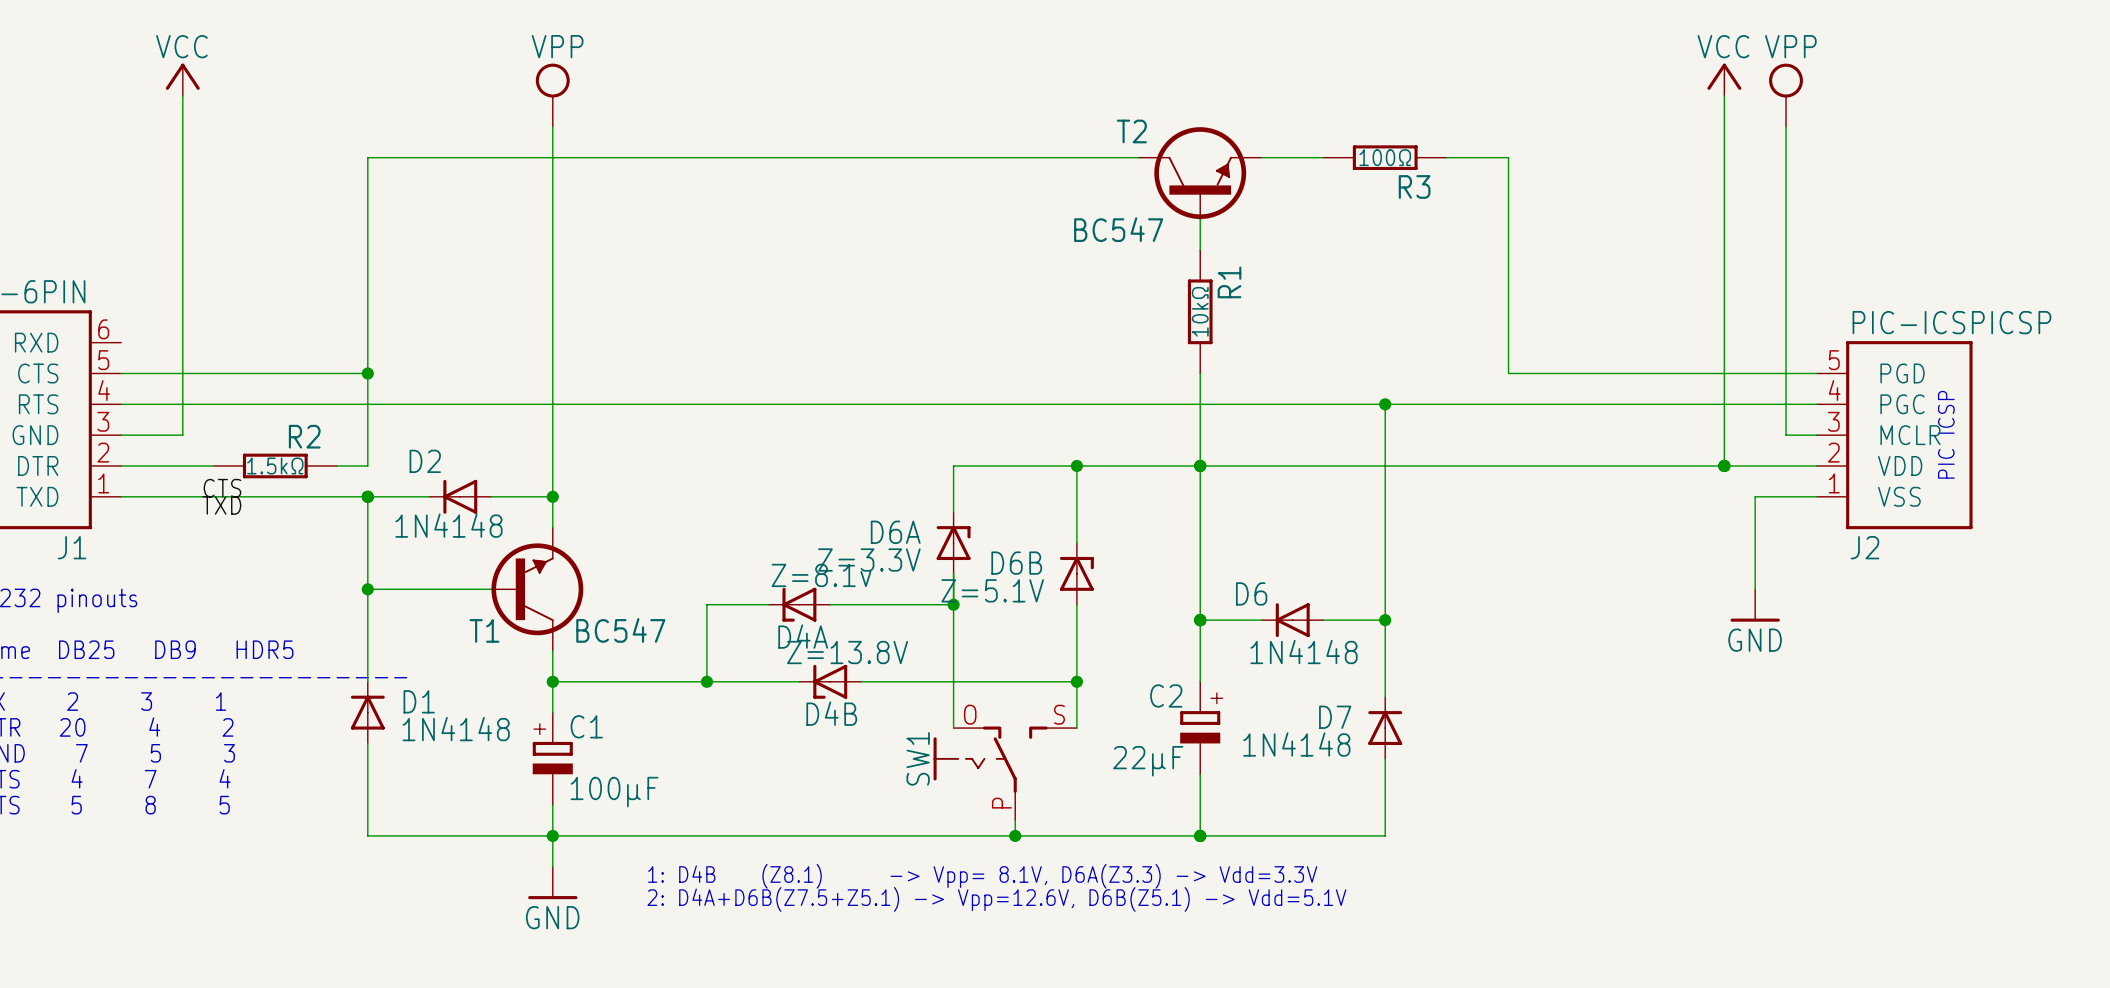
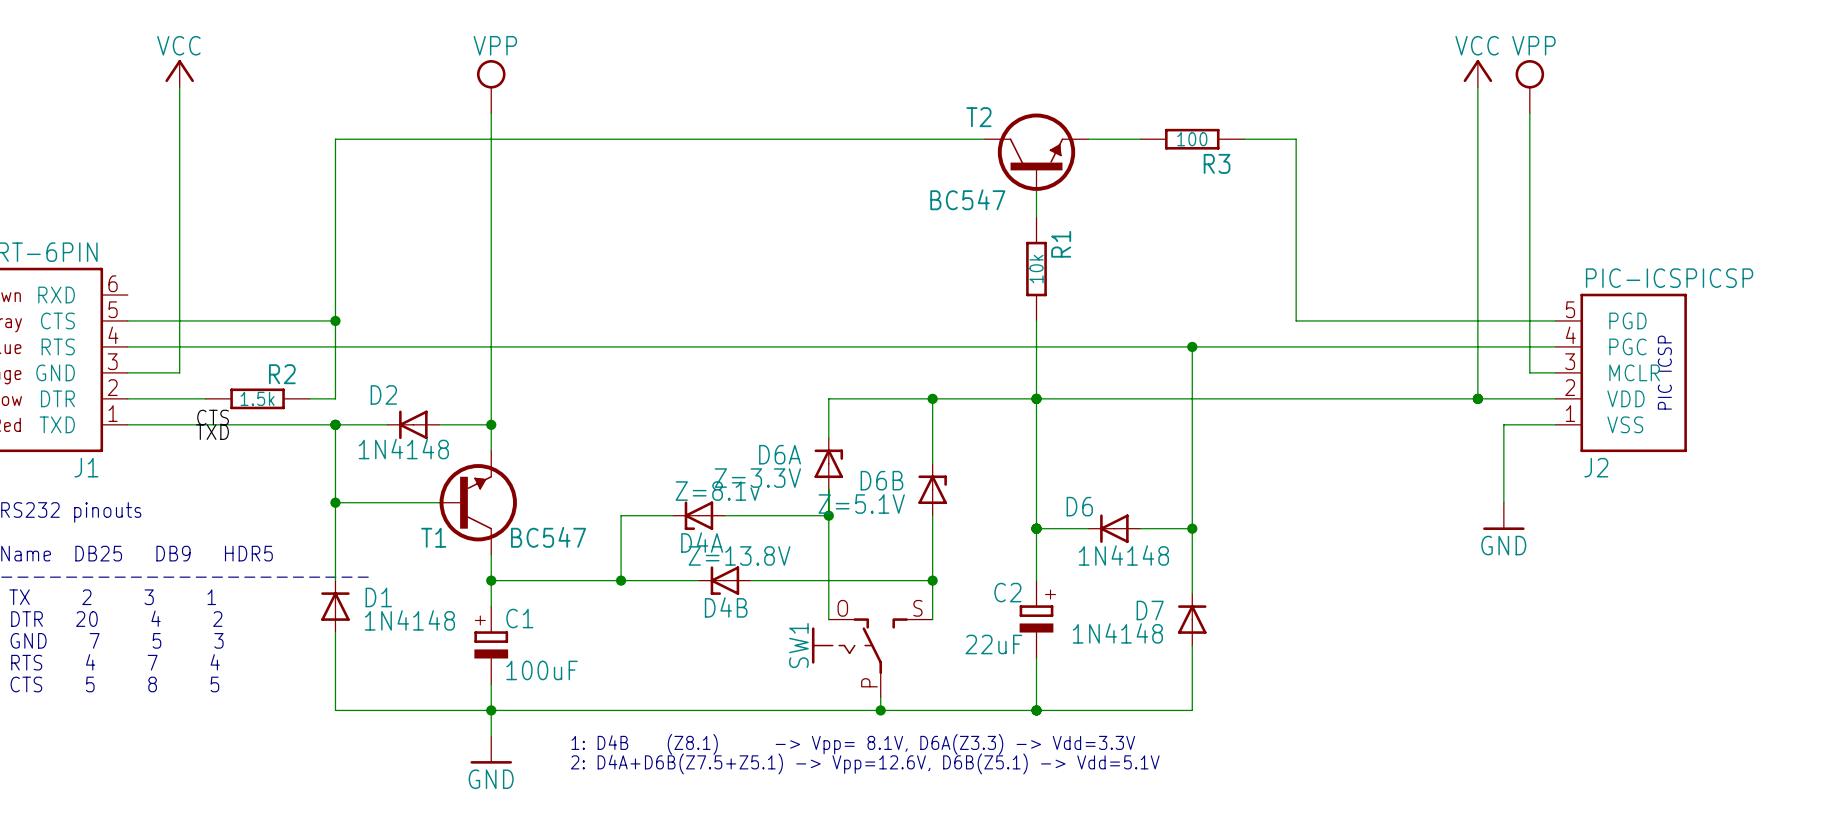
R3 value: 100Ω (1385, 157) -> 100 (1192, 139)
R1 value: 10kΩ (1200, 311) -> 10k (1036, 269)
R2 value: 1.5kΩ (275, 465) -> 1.5k (257, 398)
C2 value: 22μF (1148, 761) -> 22uF (993, 644)
C1 value: 100μF (614, 792) -> 100uF (542, 670)

